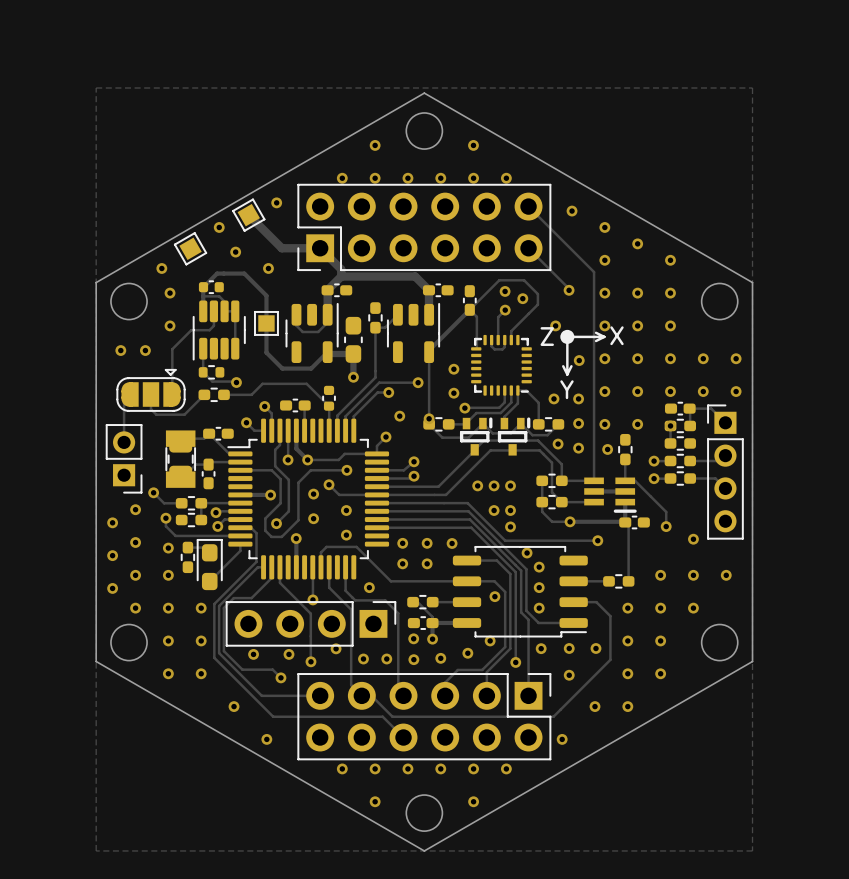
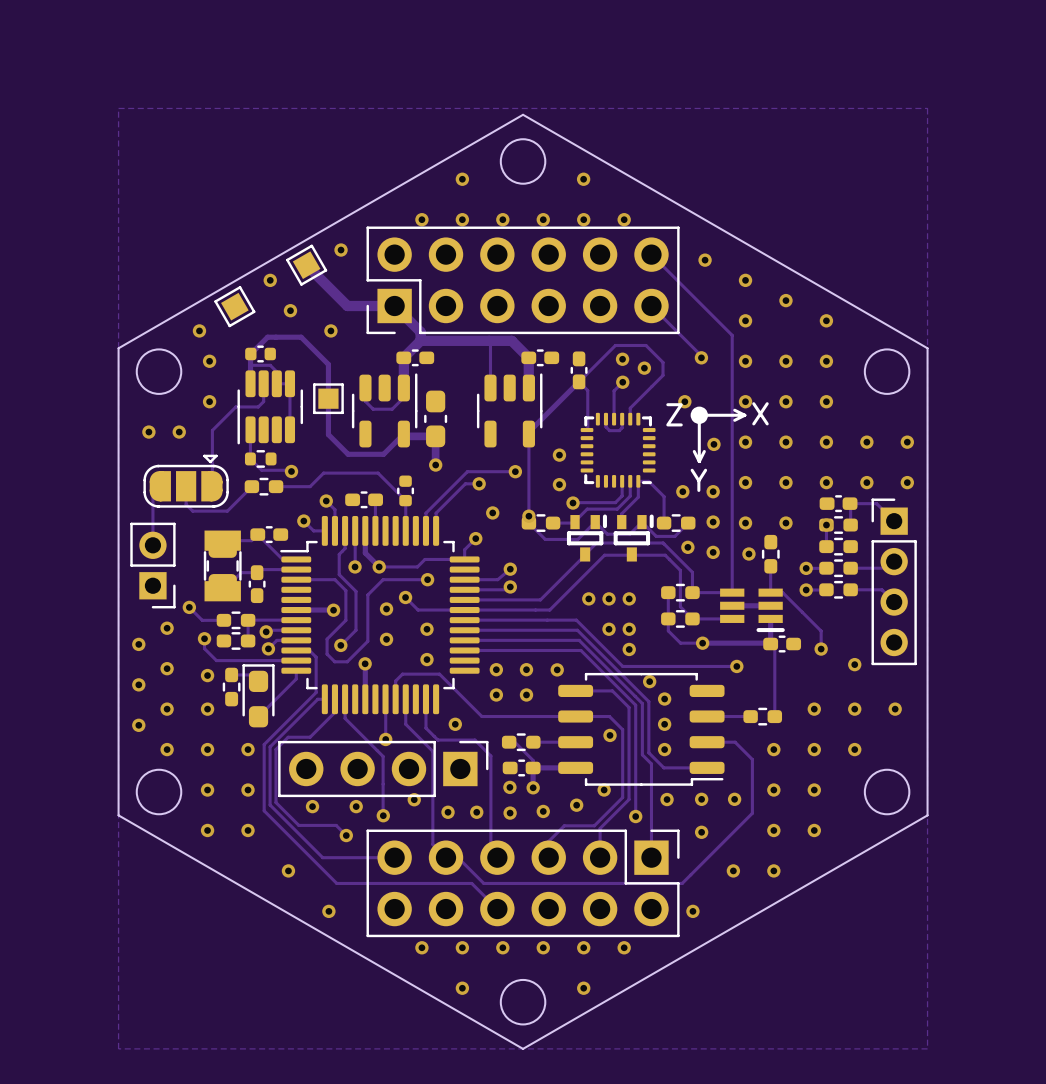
track: (397, 314) (385, 327) (375, 327) (375, 377) (337, 415) (337, 430) -> (490, 388) (489, 340)
part: (375, 317) -> none

